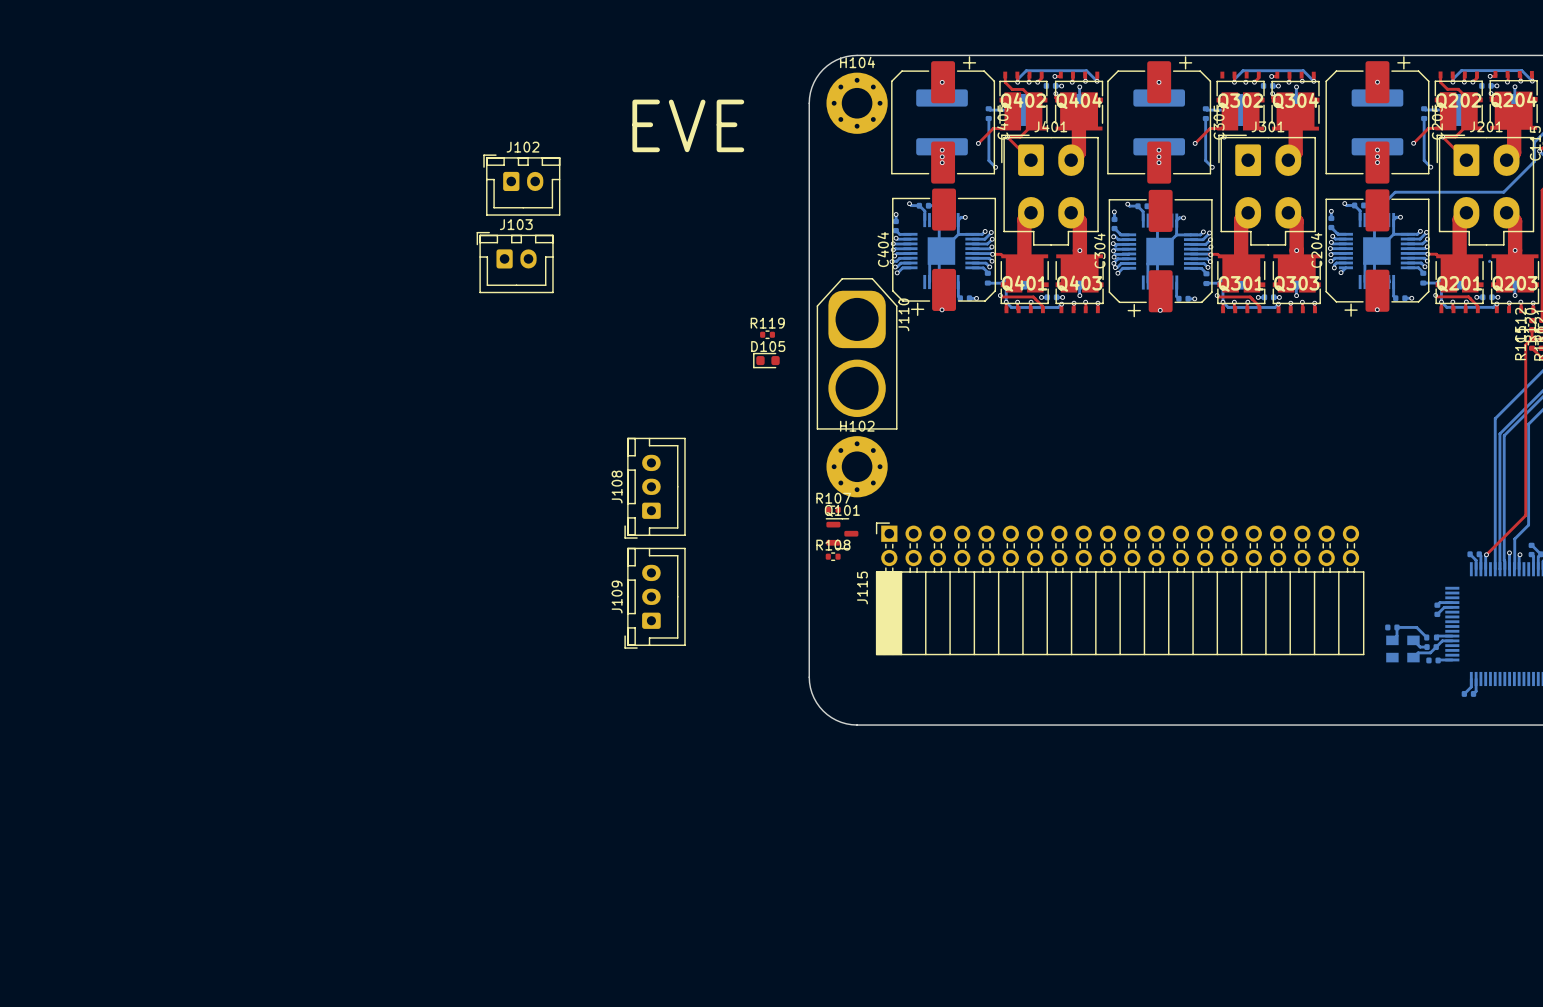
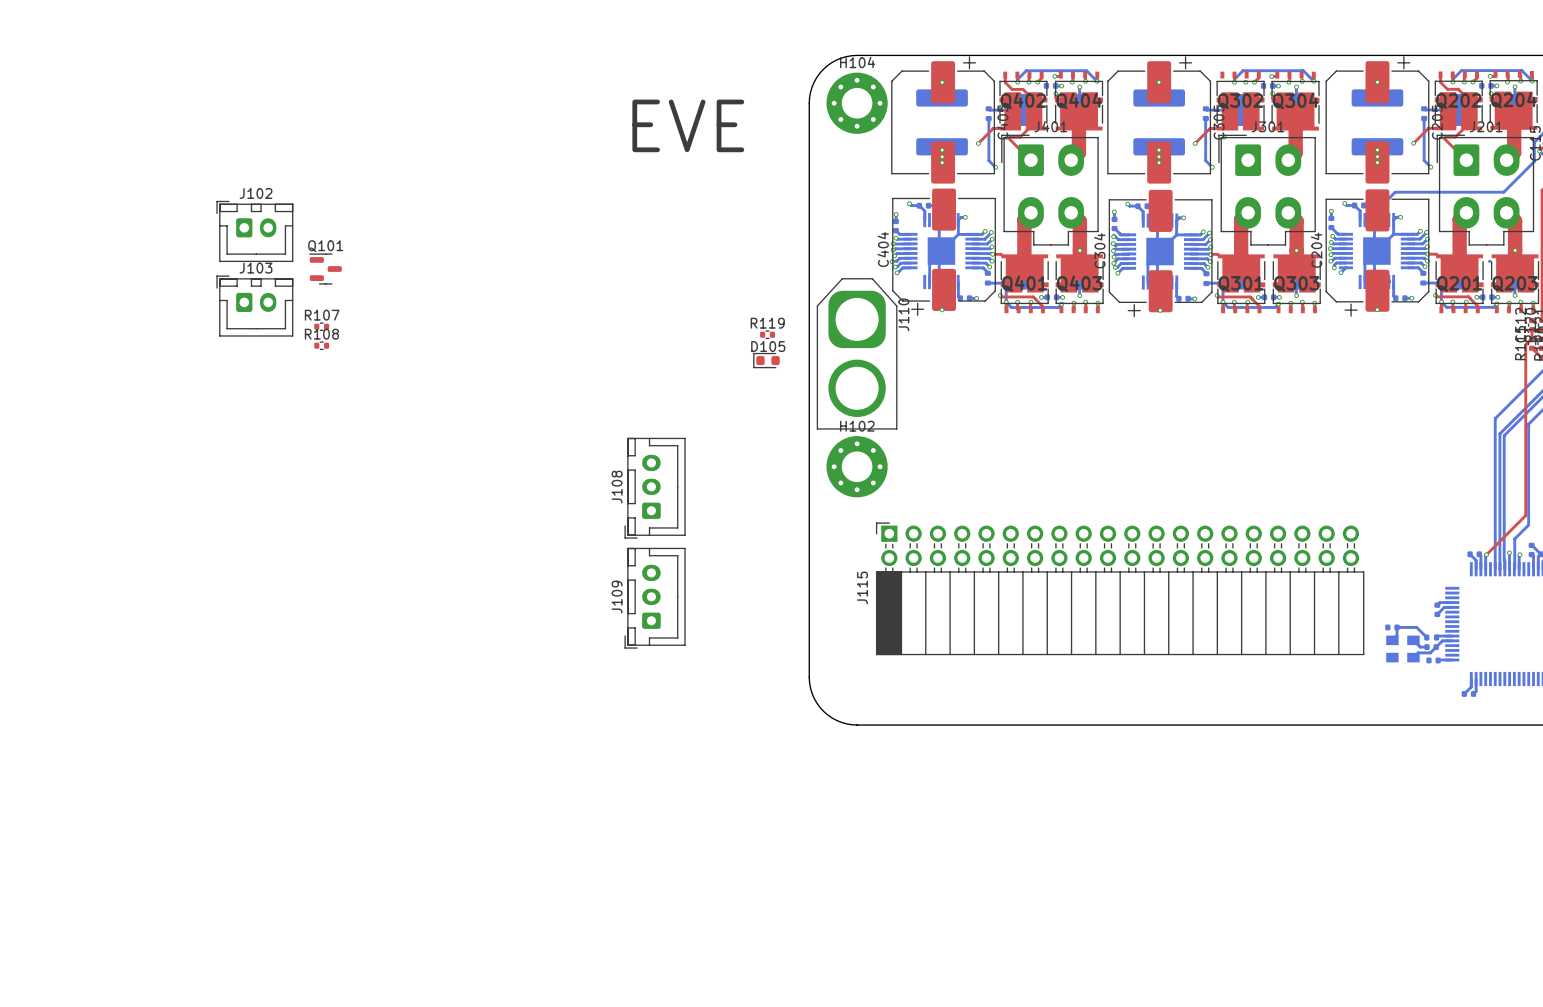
J102 position: (521, 185) -> (254, 231)
J103 position: (515, 262) -> (254, 306)
R107 position: (833, 509) -> (321, 326)
Q101 position: (842, 533) -> (325, 269)
R108 position: (833, 556) -> (321, 345)

